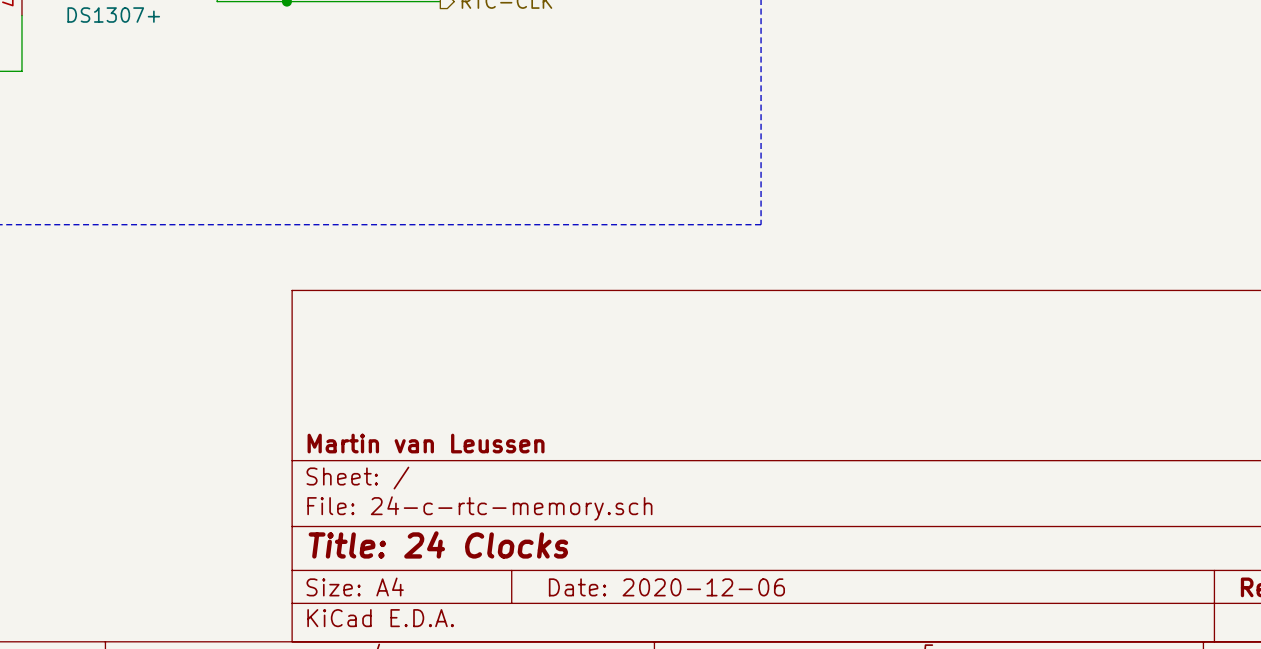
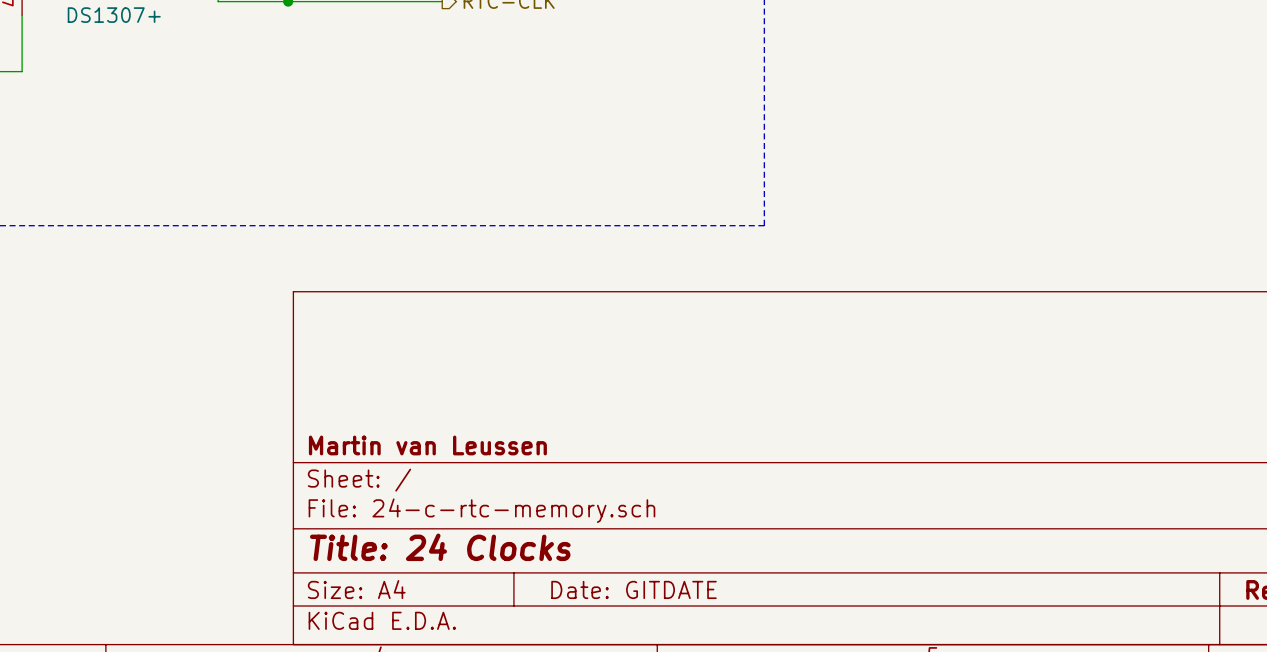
title block: Date: 2020-12-06 (666, 587) -> Date: GITDATE (633, 589)

